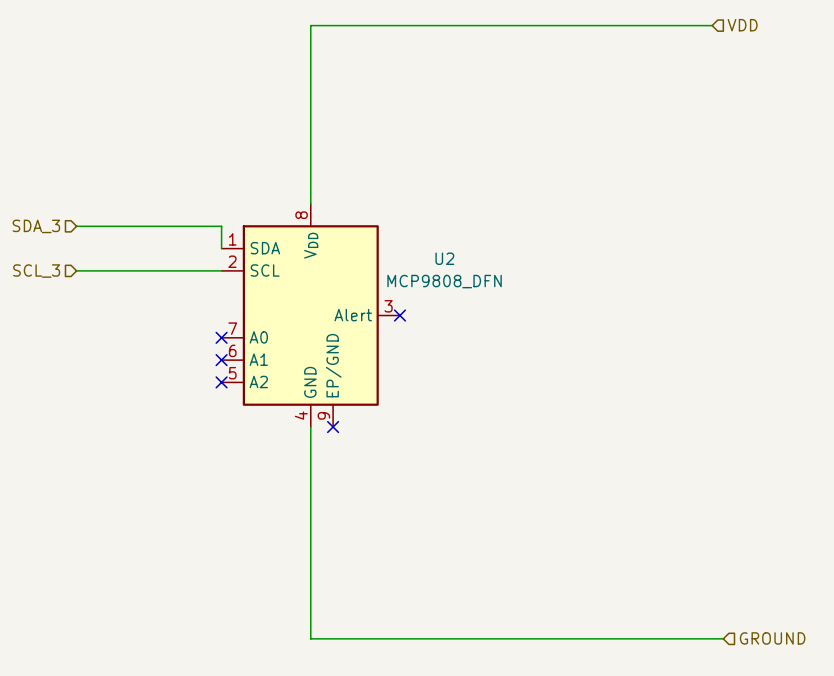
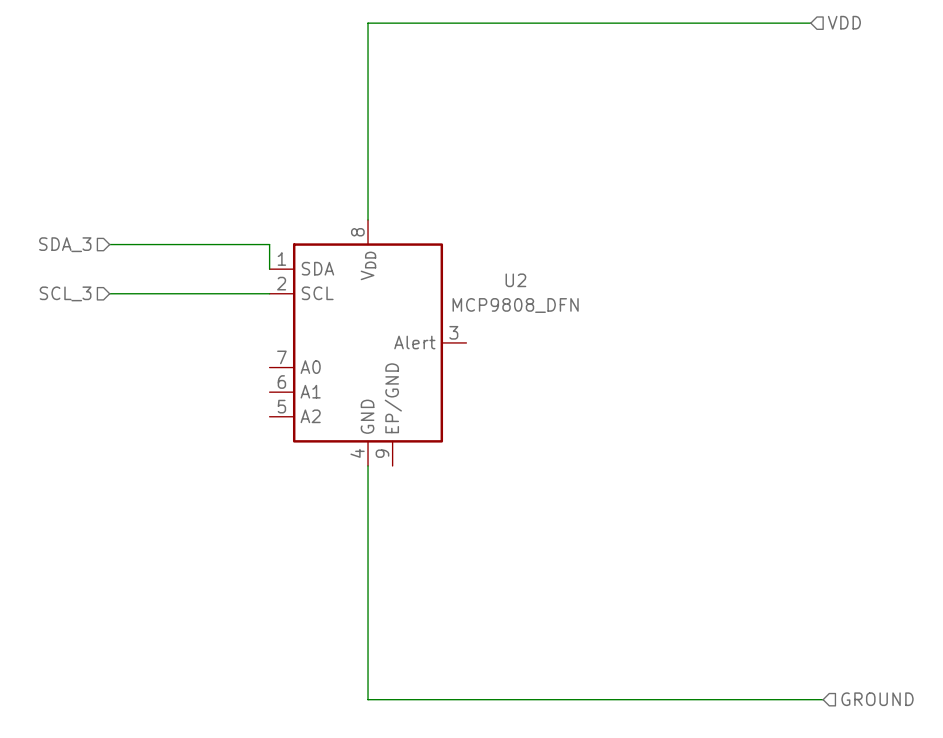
no-connect mark: (399, 315) -> none
no-connect mark: (221, 337) -> none
no-connect mark: (221, 360) -> none
no-connect mark: (221, 382) -> none
no-connect mark: (333, 427) -> none

